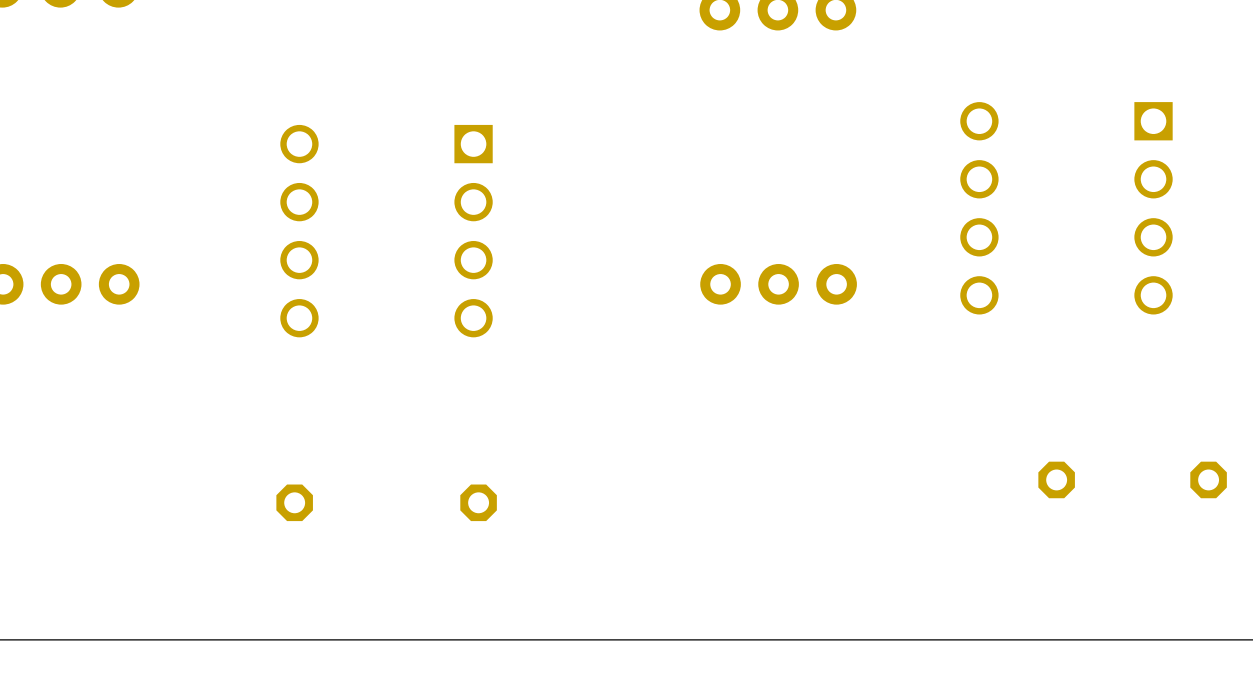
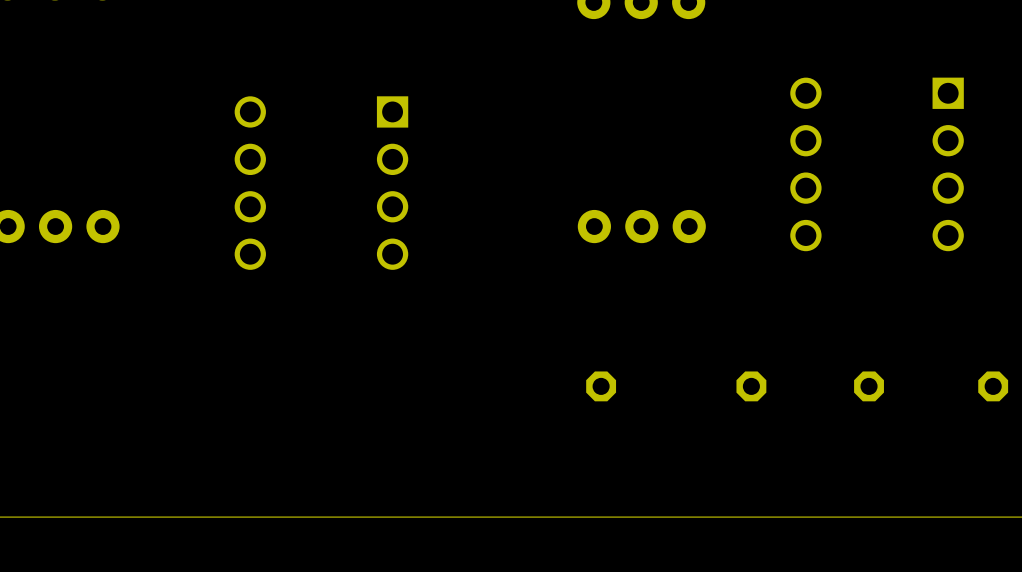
part: none -> (601, 386)
part: none -> (751, 386)
part: (294, 502) -> none
part: (478, 502) -> none

